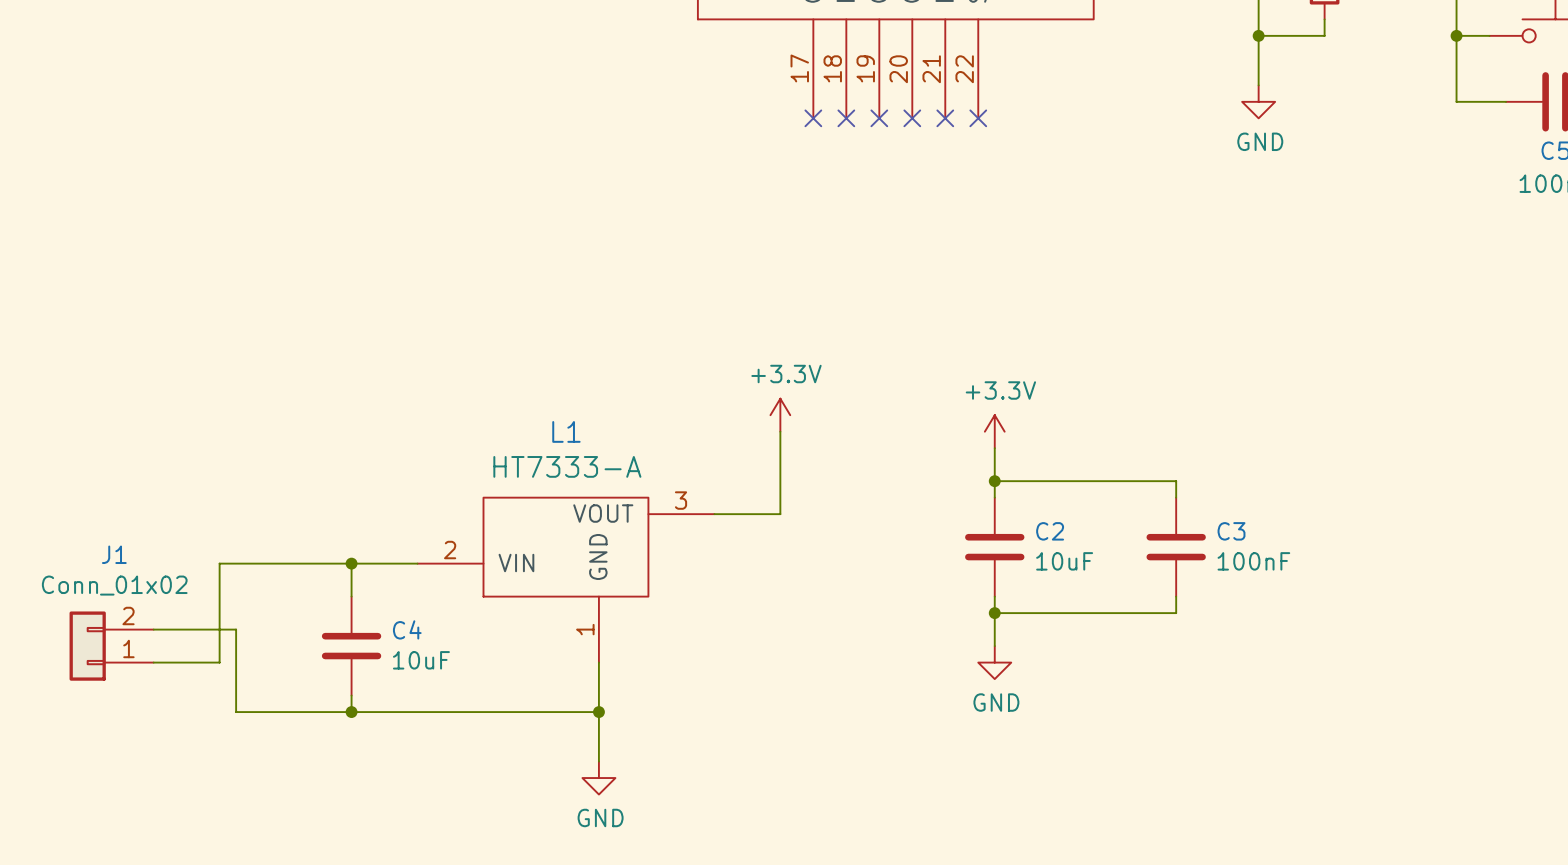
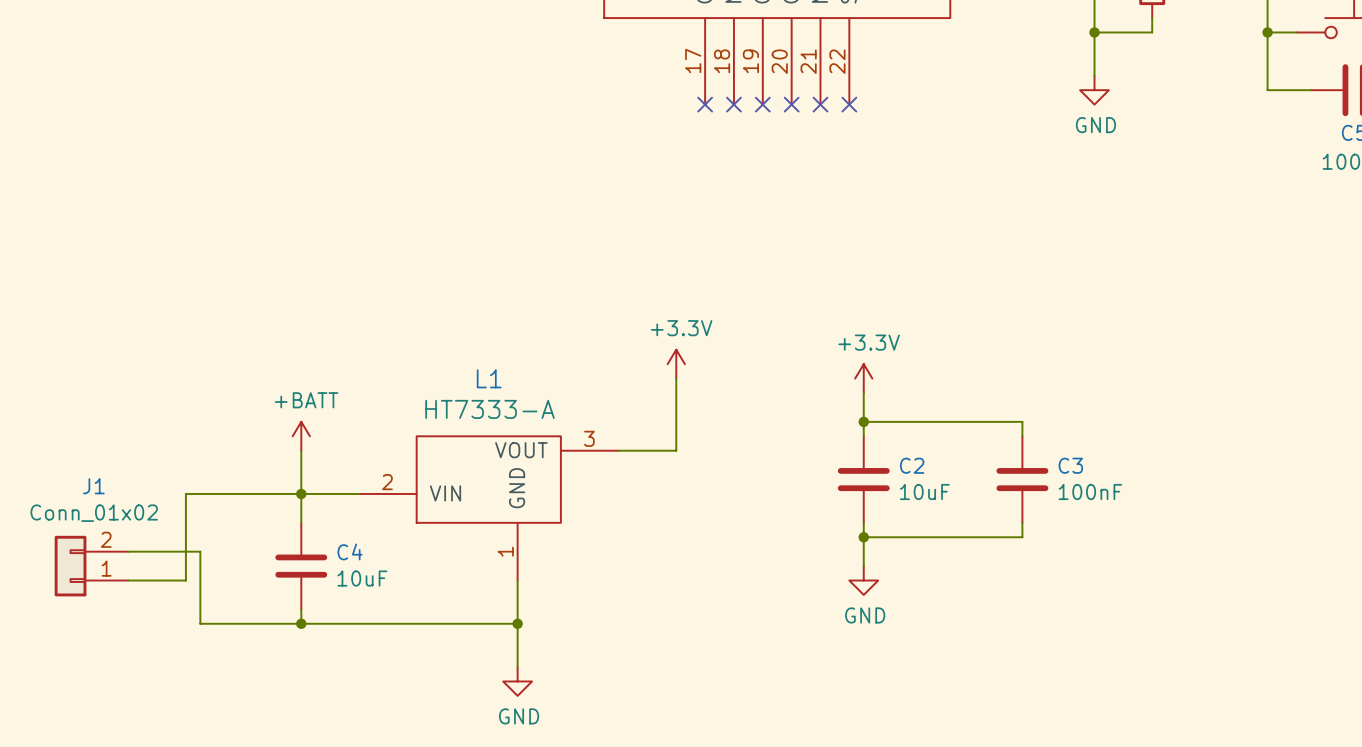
power symbol: none -> +BATT (301, 436)
wire: none -> (301, 450) (301, 493)

